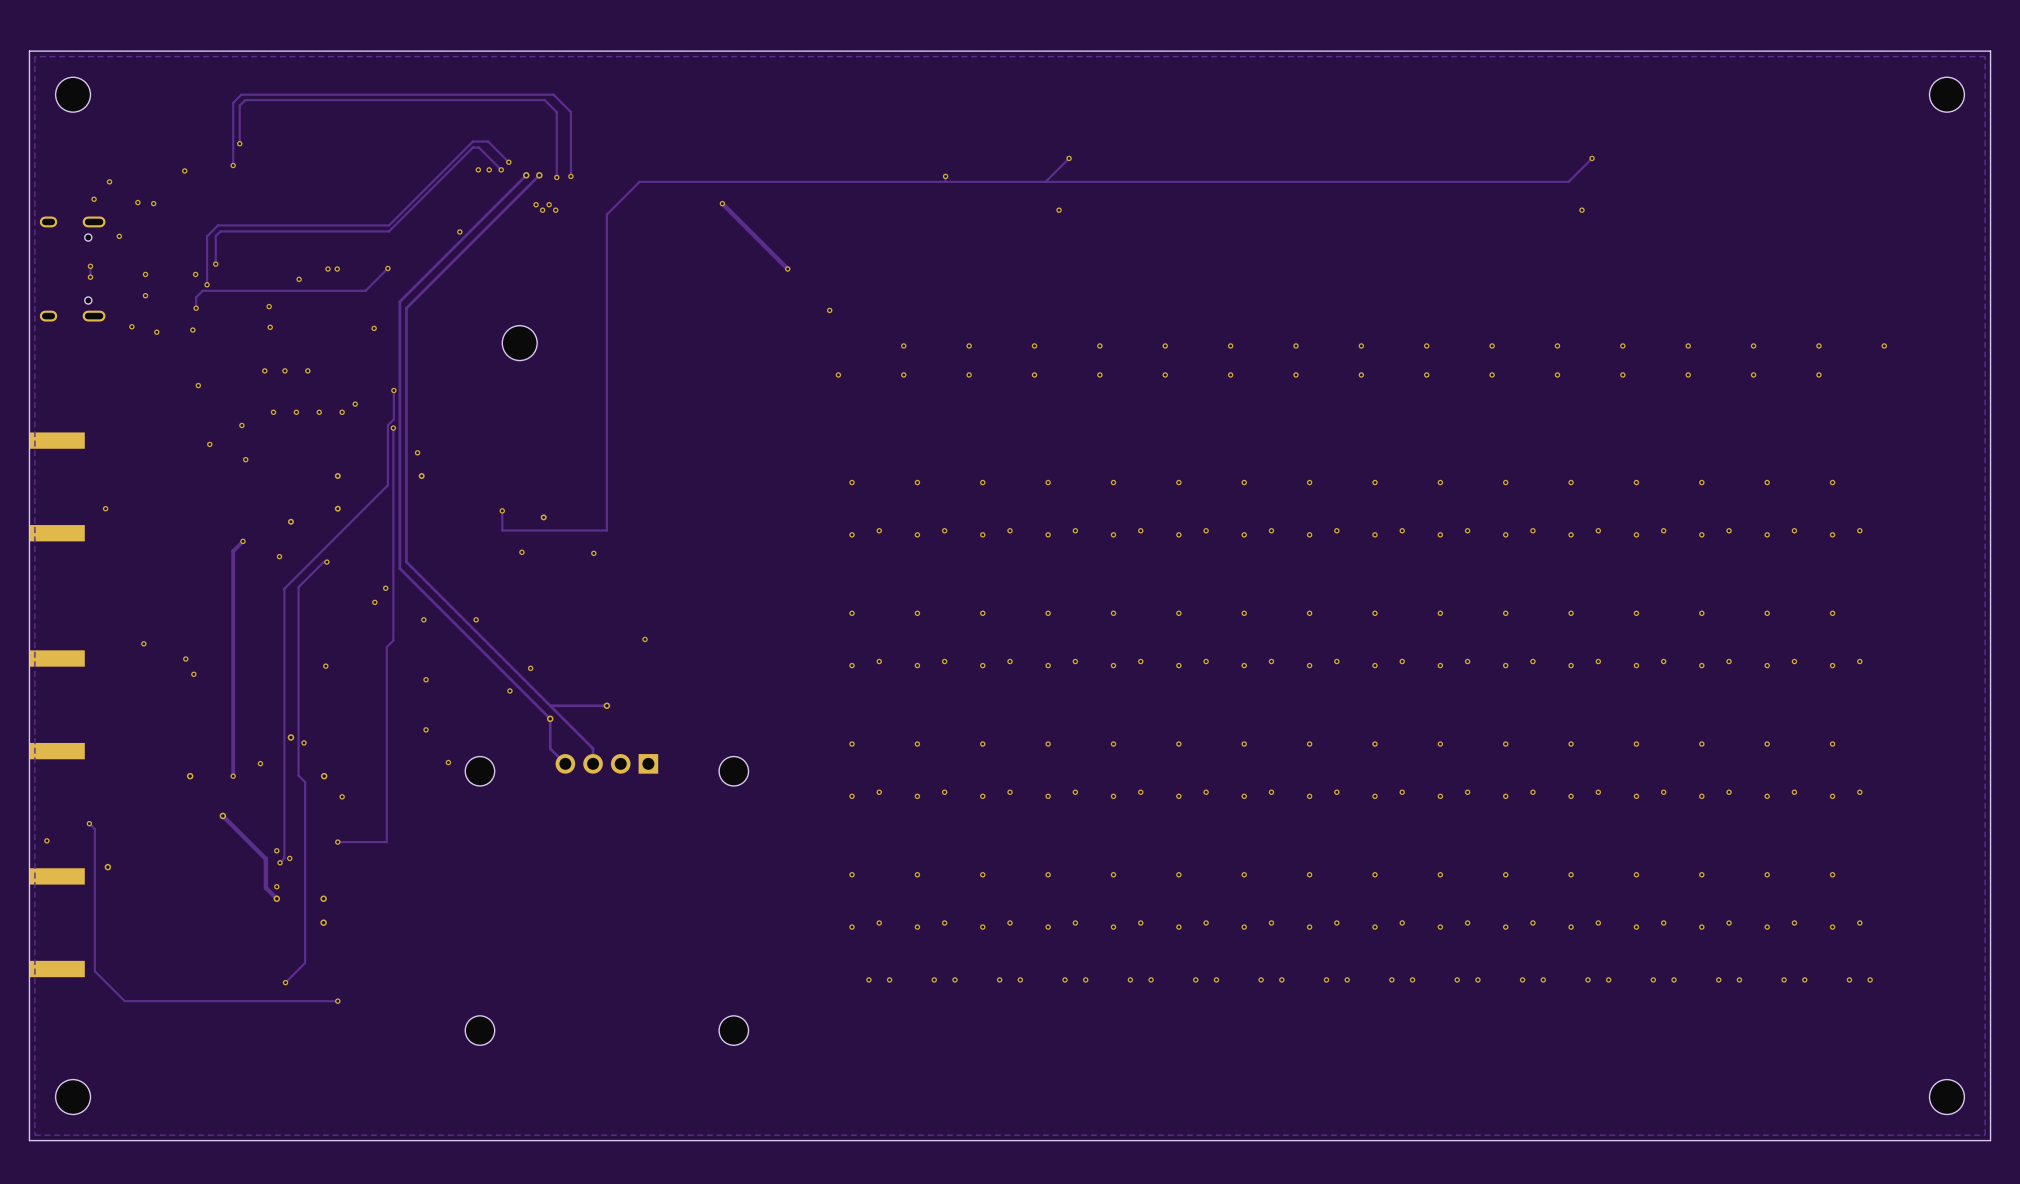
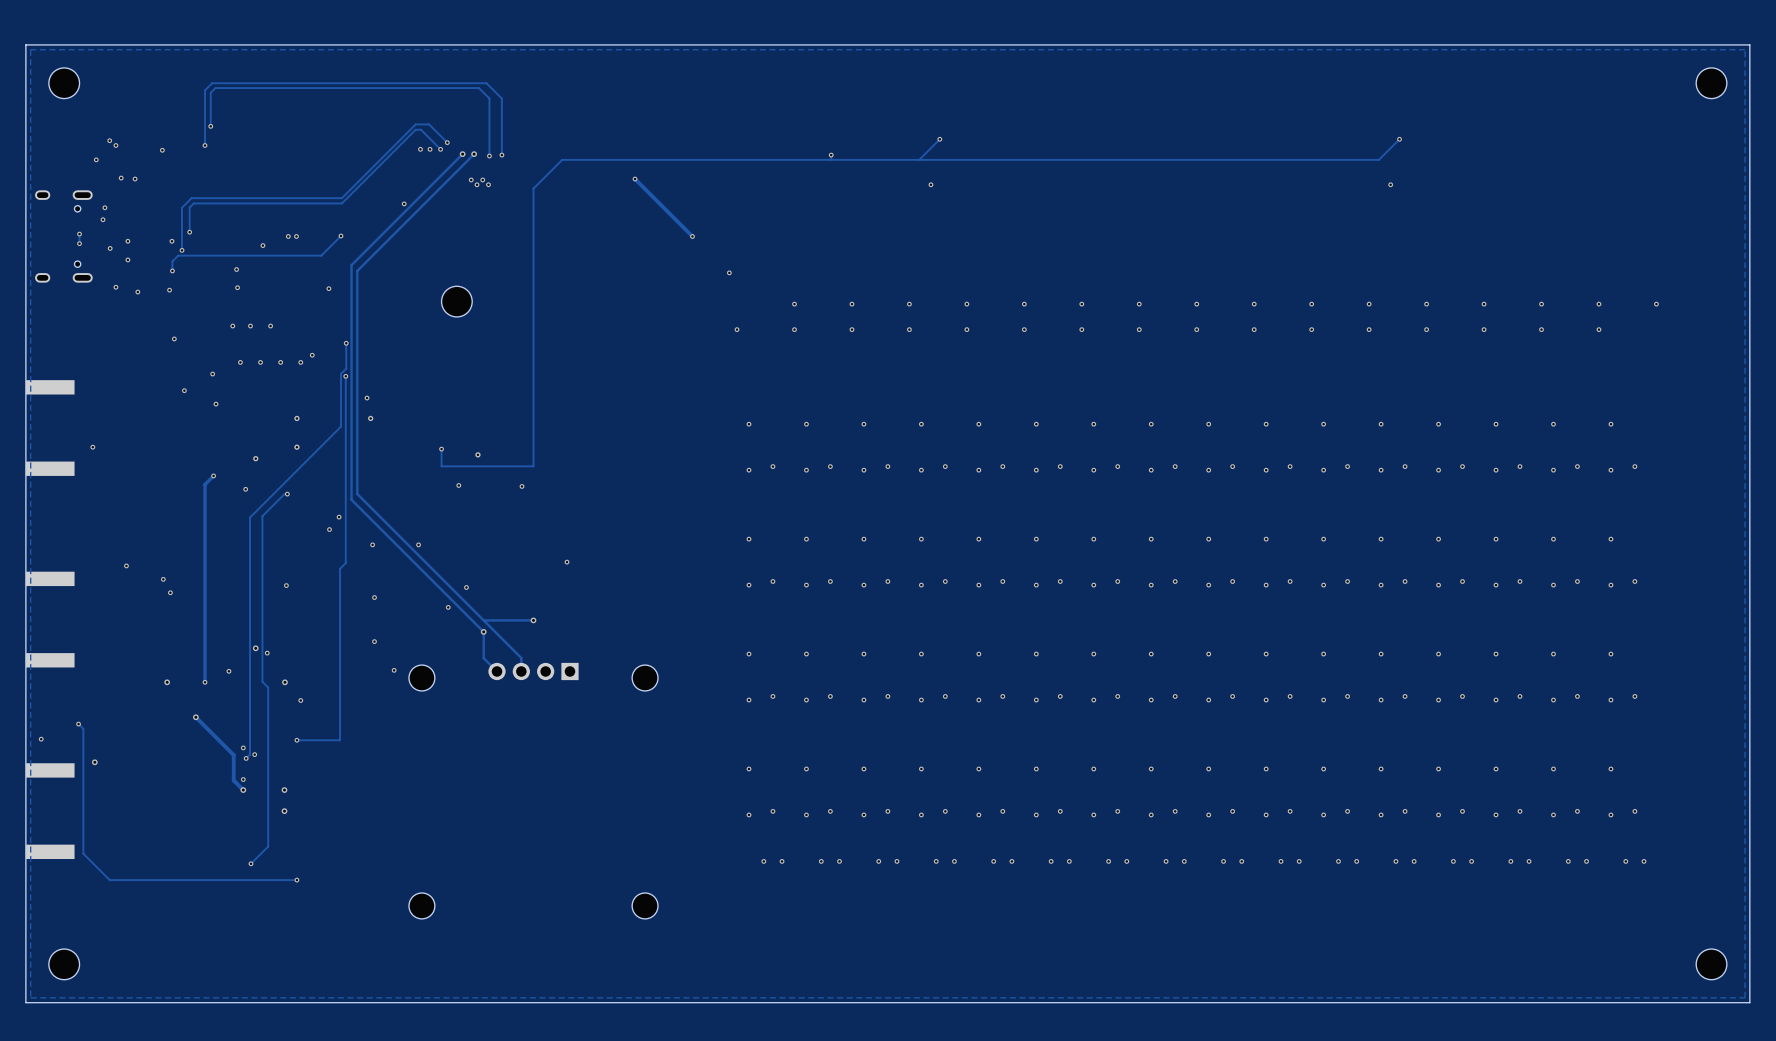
via: none -> (109, 140)
via: none -> (115, 145)
via: (94, 199) -> none
via: none -> (102, 219)
via: none -> (110, 248)

